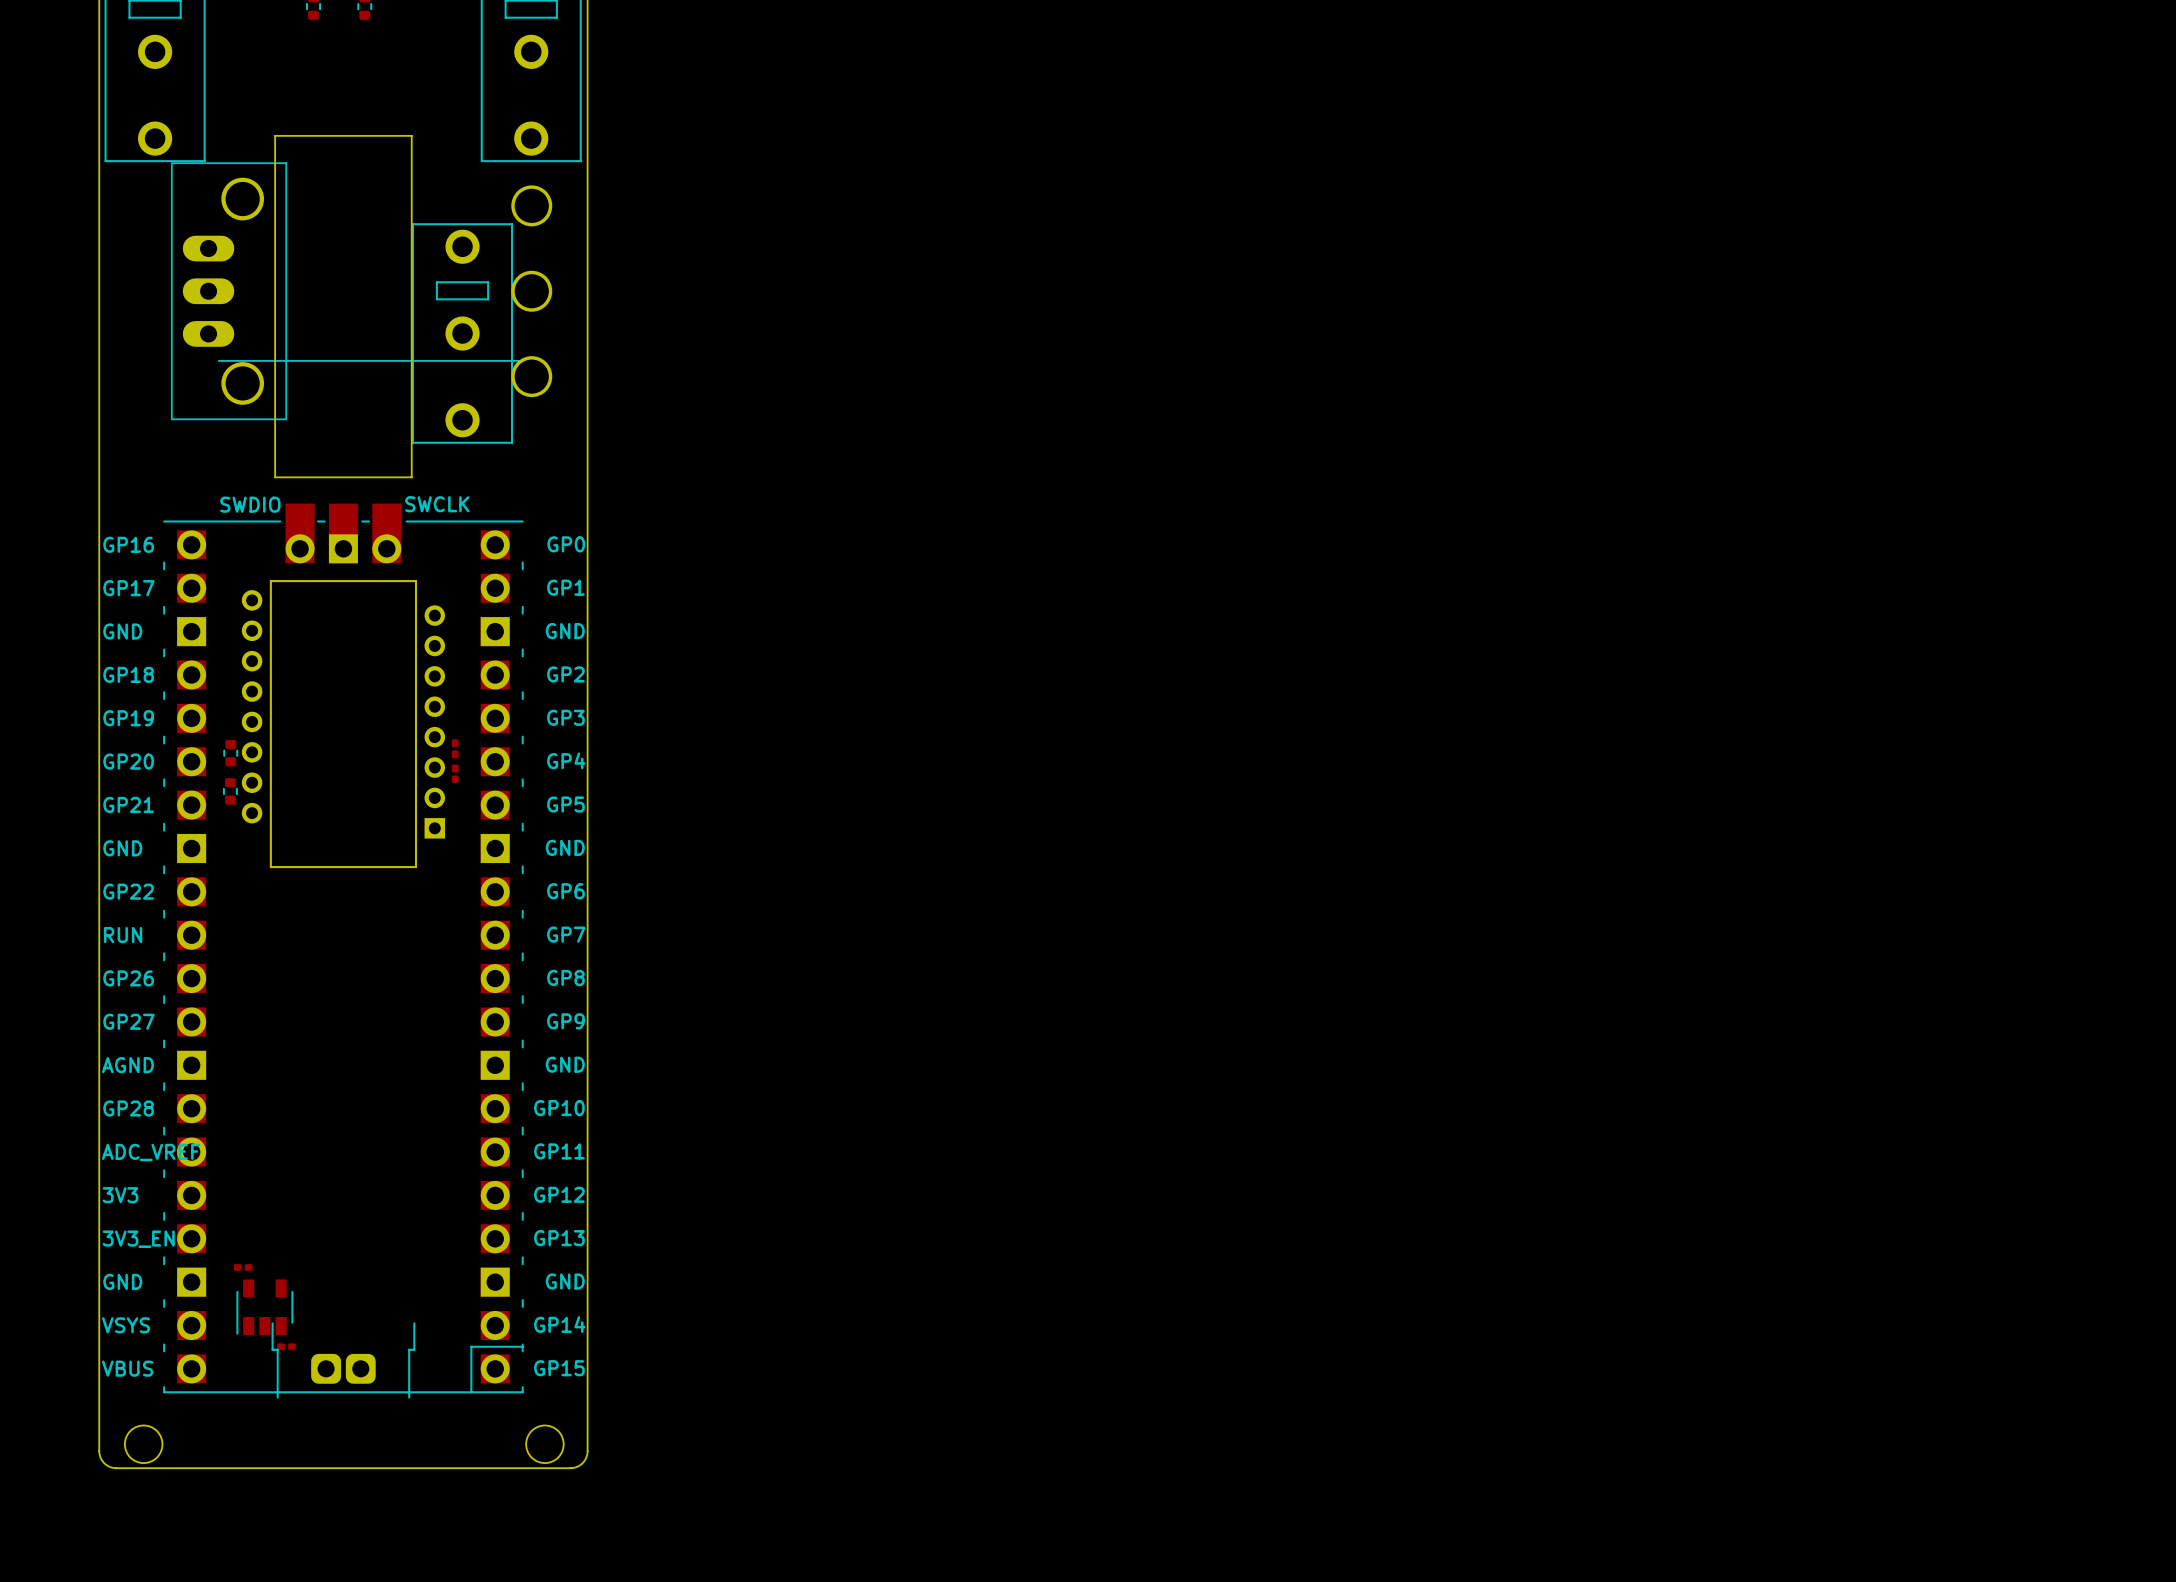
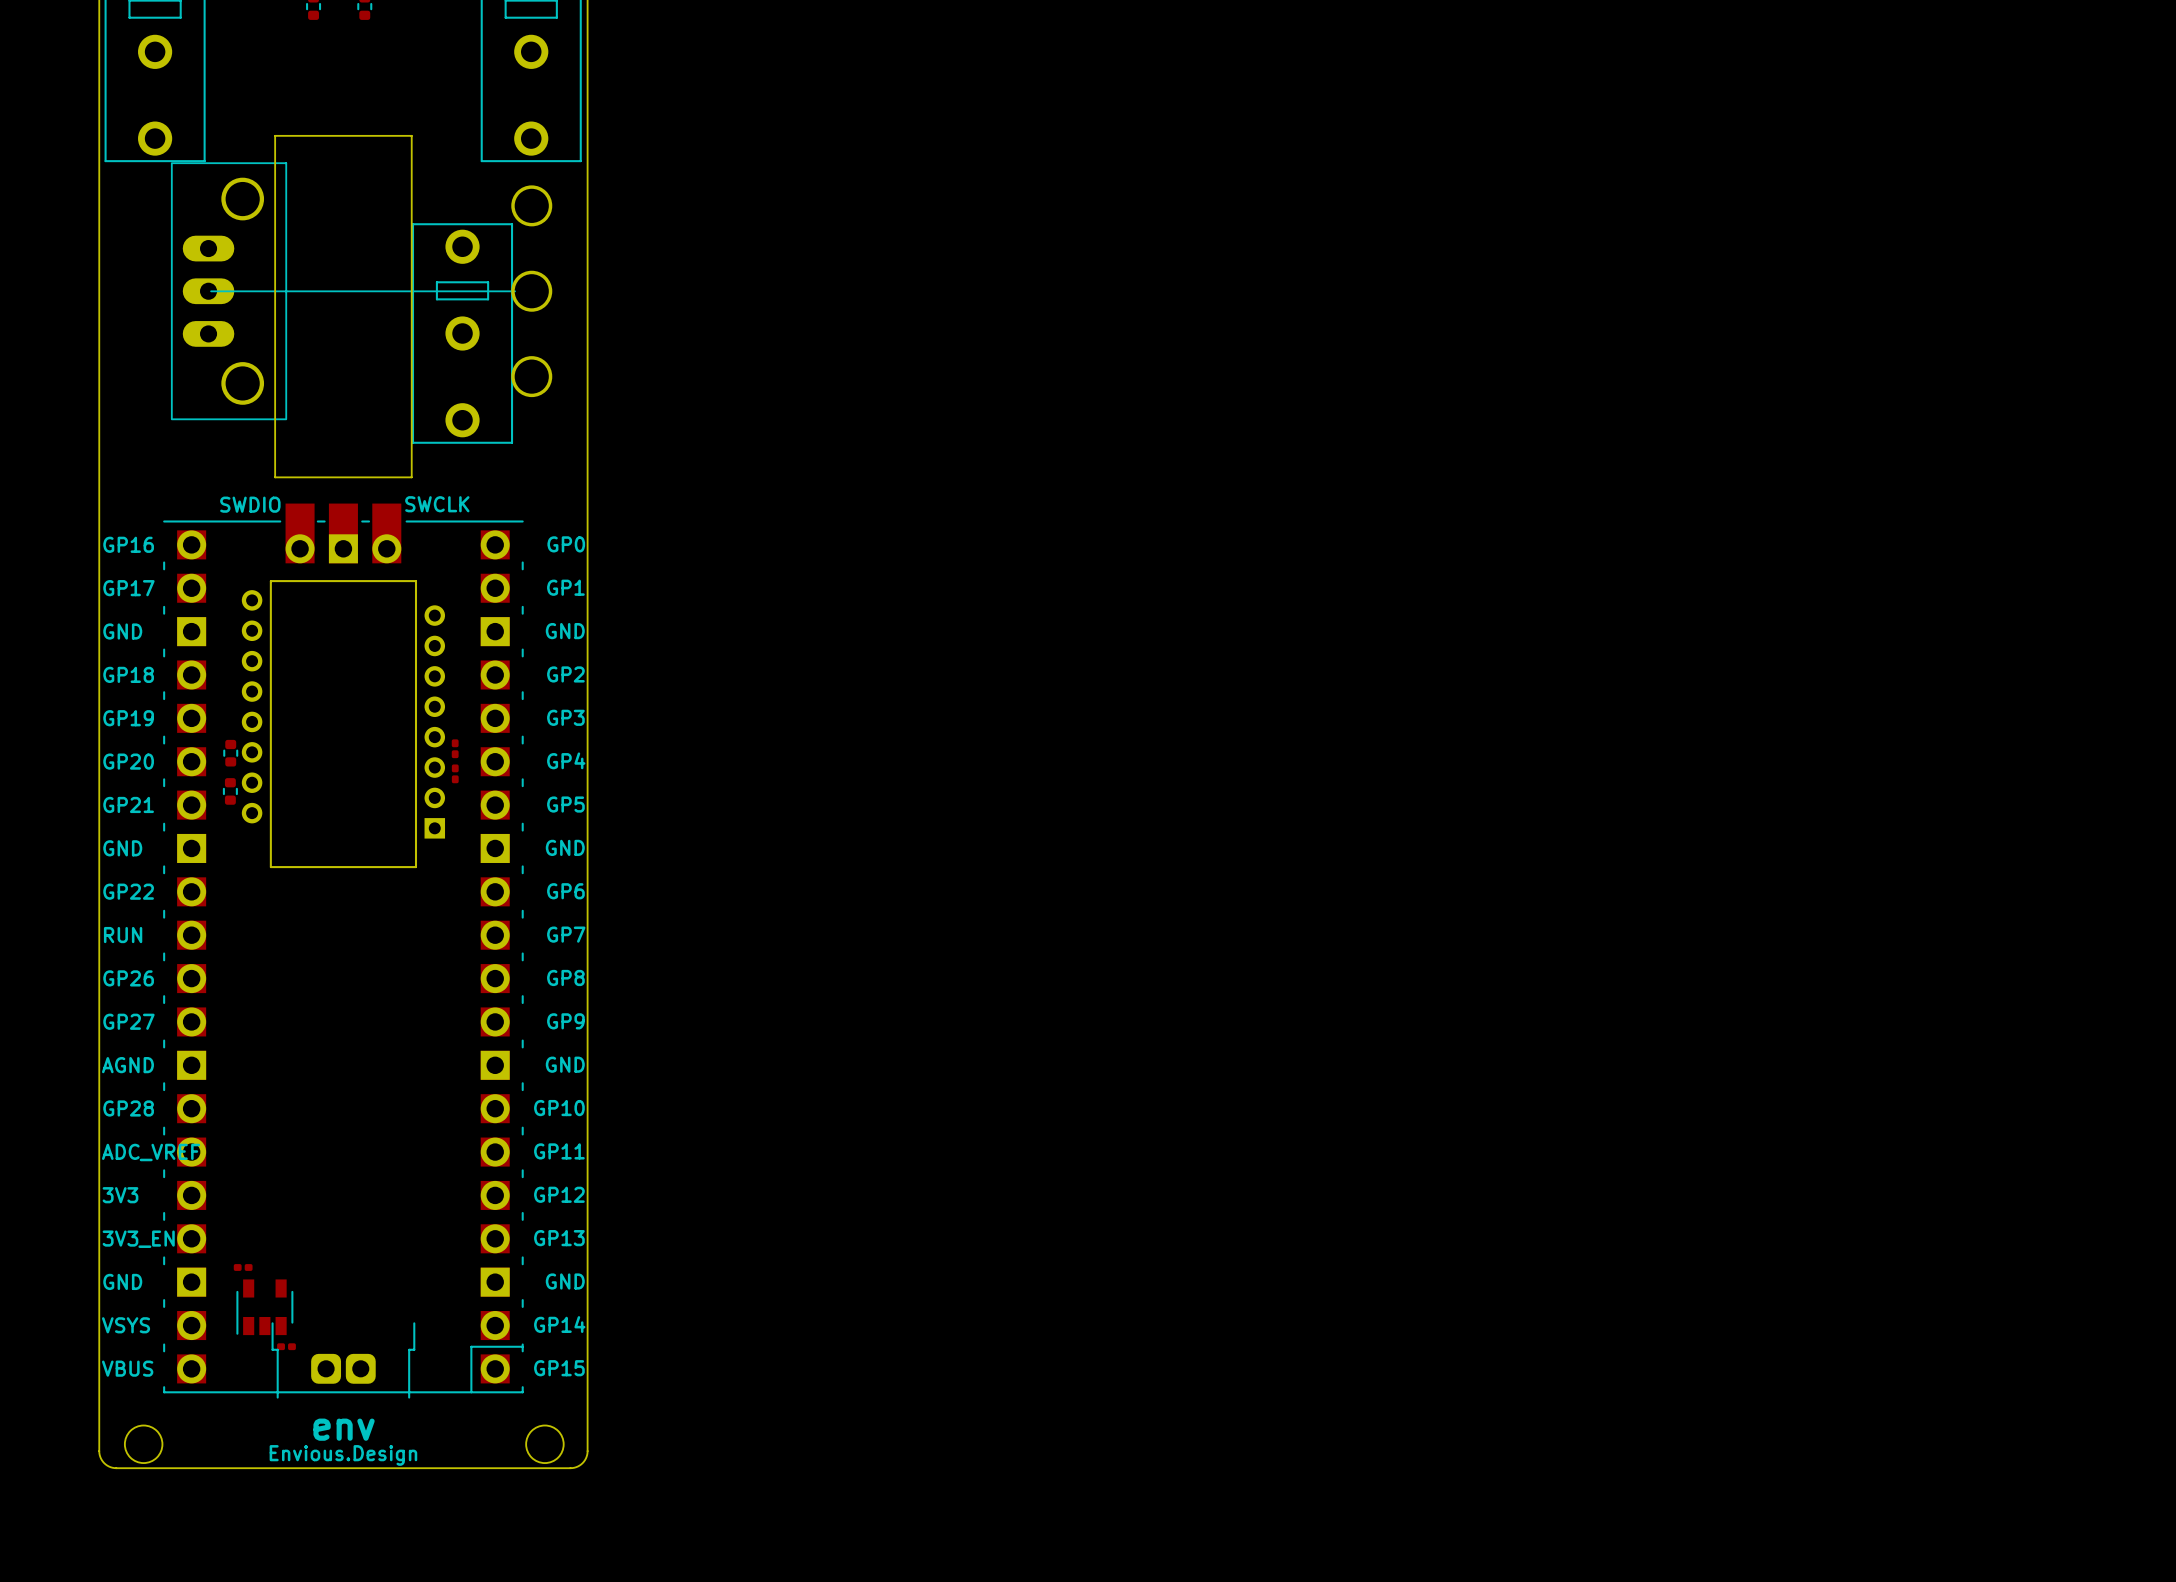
line: (218, 360) (522, 360) -> (211, 291) (515, 291)
text: none -> env (344, 1429)
text: none -> Envious.Design (343, 1455)

